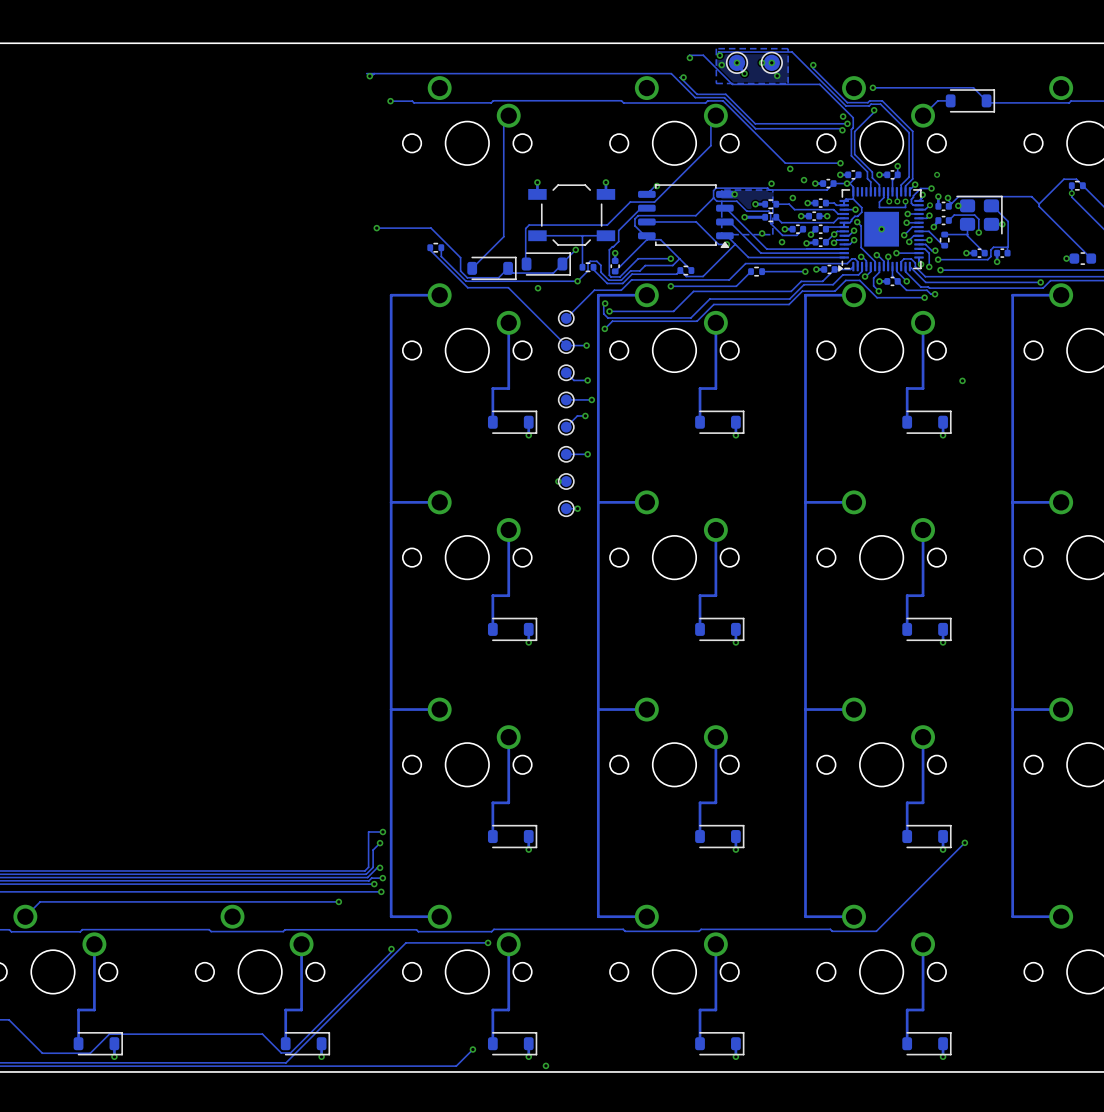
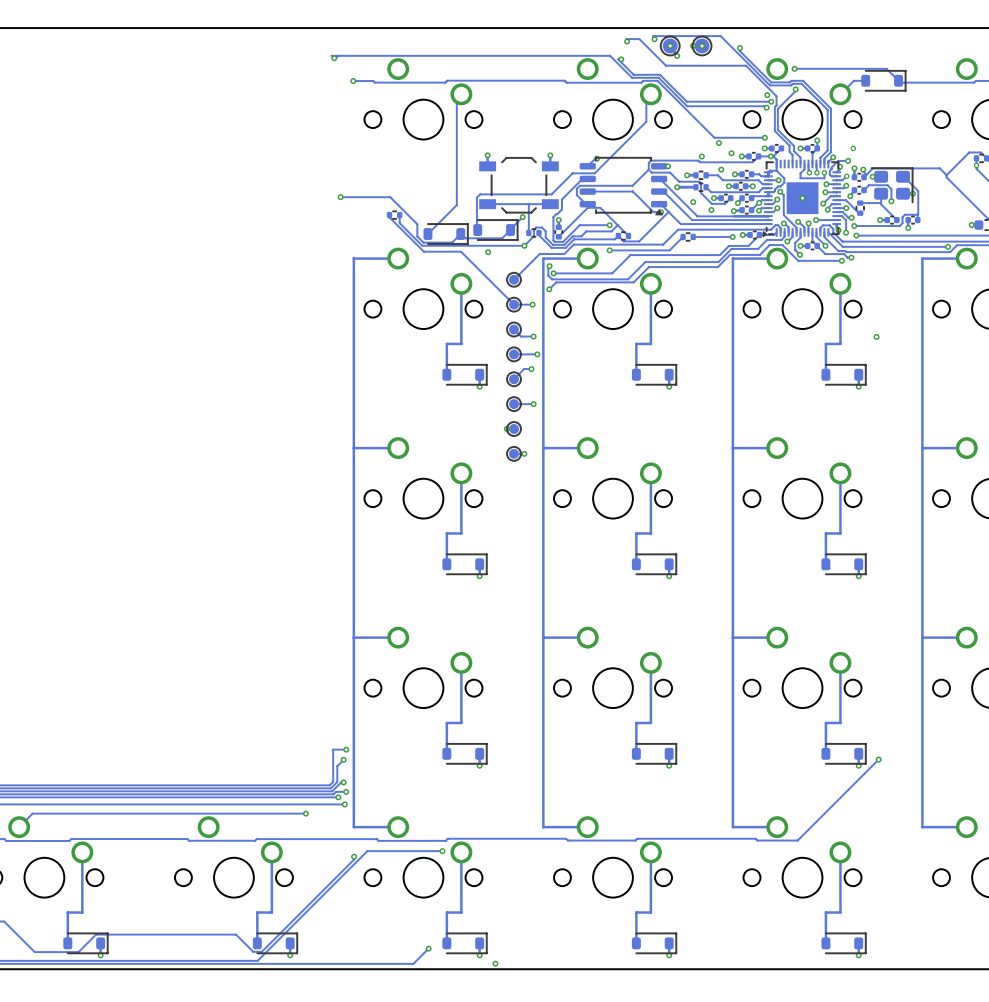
zone outline: (788, 48) (716, 48) (716, 83) (788, 83) (788, 48) -> none
via: (721, 65) -> none
via: (777, 75) -> none
zone outline: (772, 190) (721, 190) (721, 234) (772, 234) (772, 190) -> none

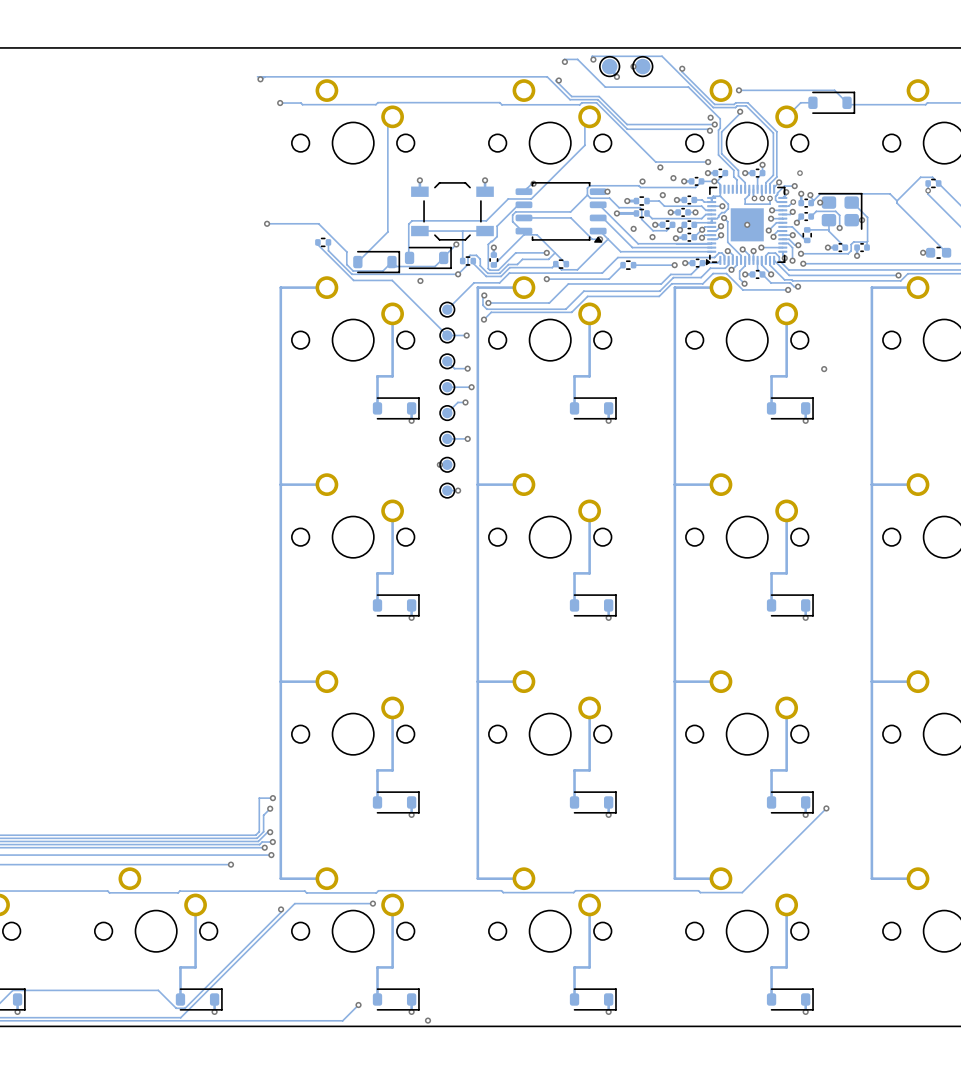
via: (670, 45) -> none
via: (702, 45) -> none

